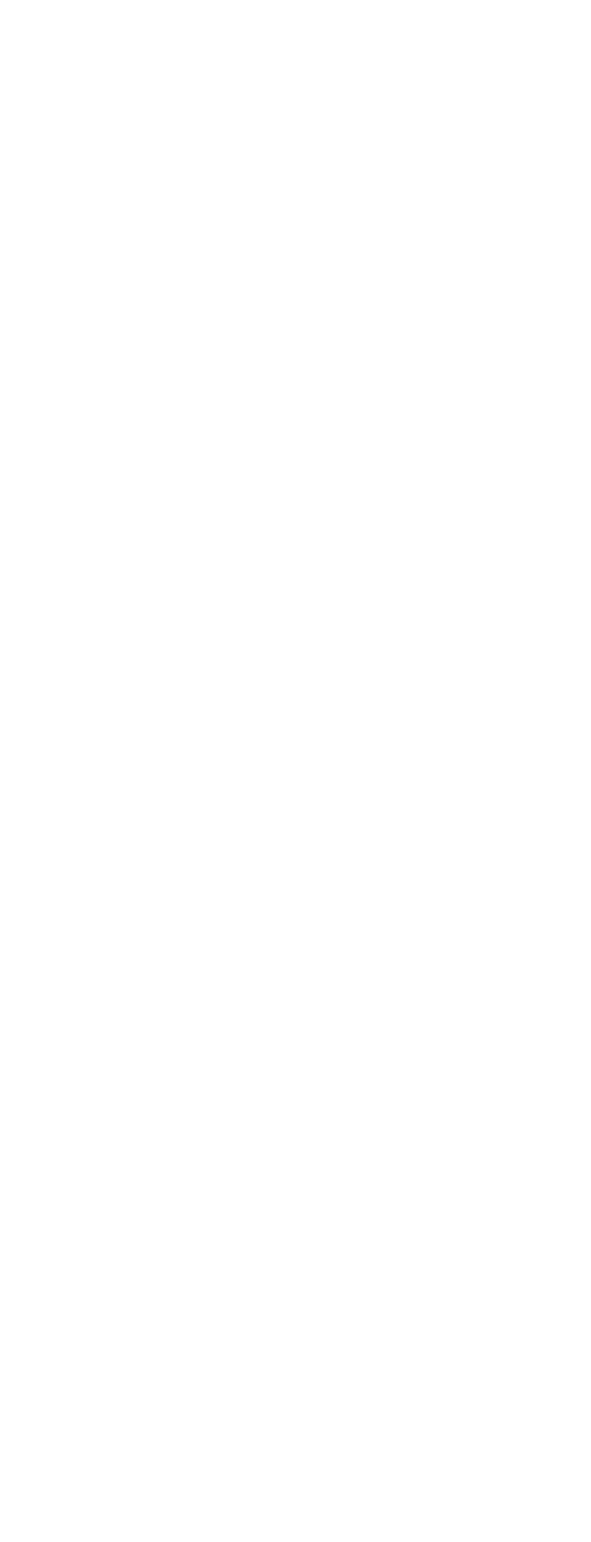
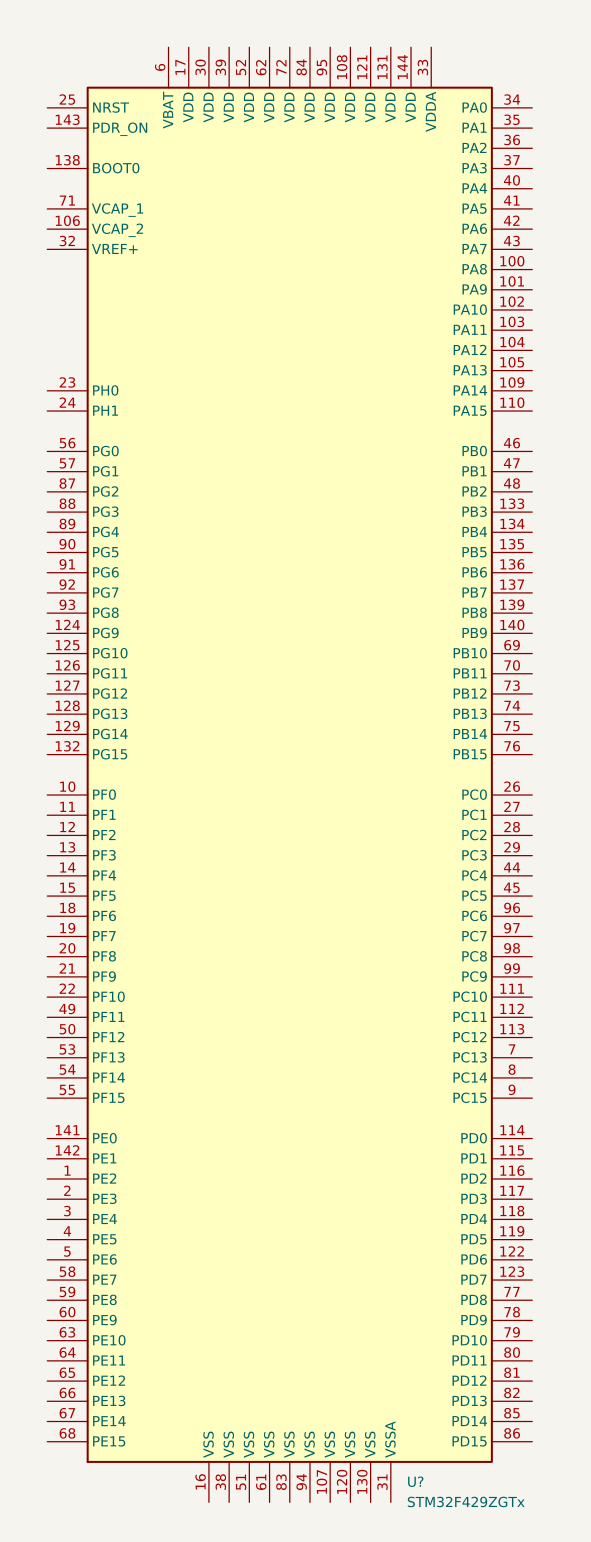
U?: none -> STM32F429ZGTx (289, 774)

